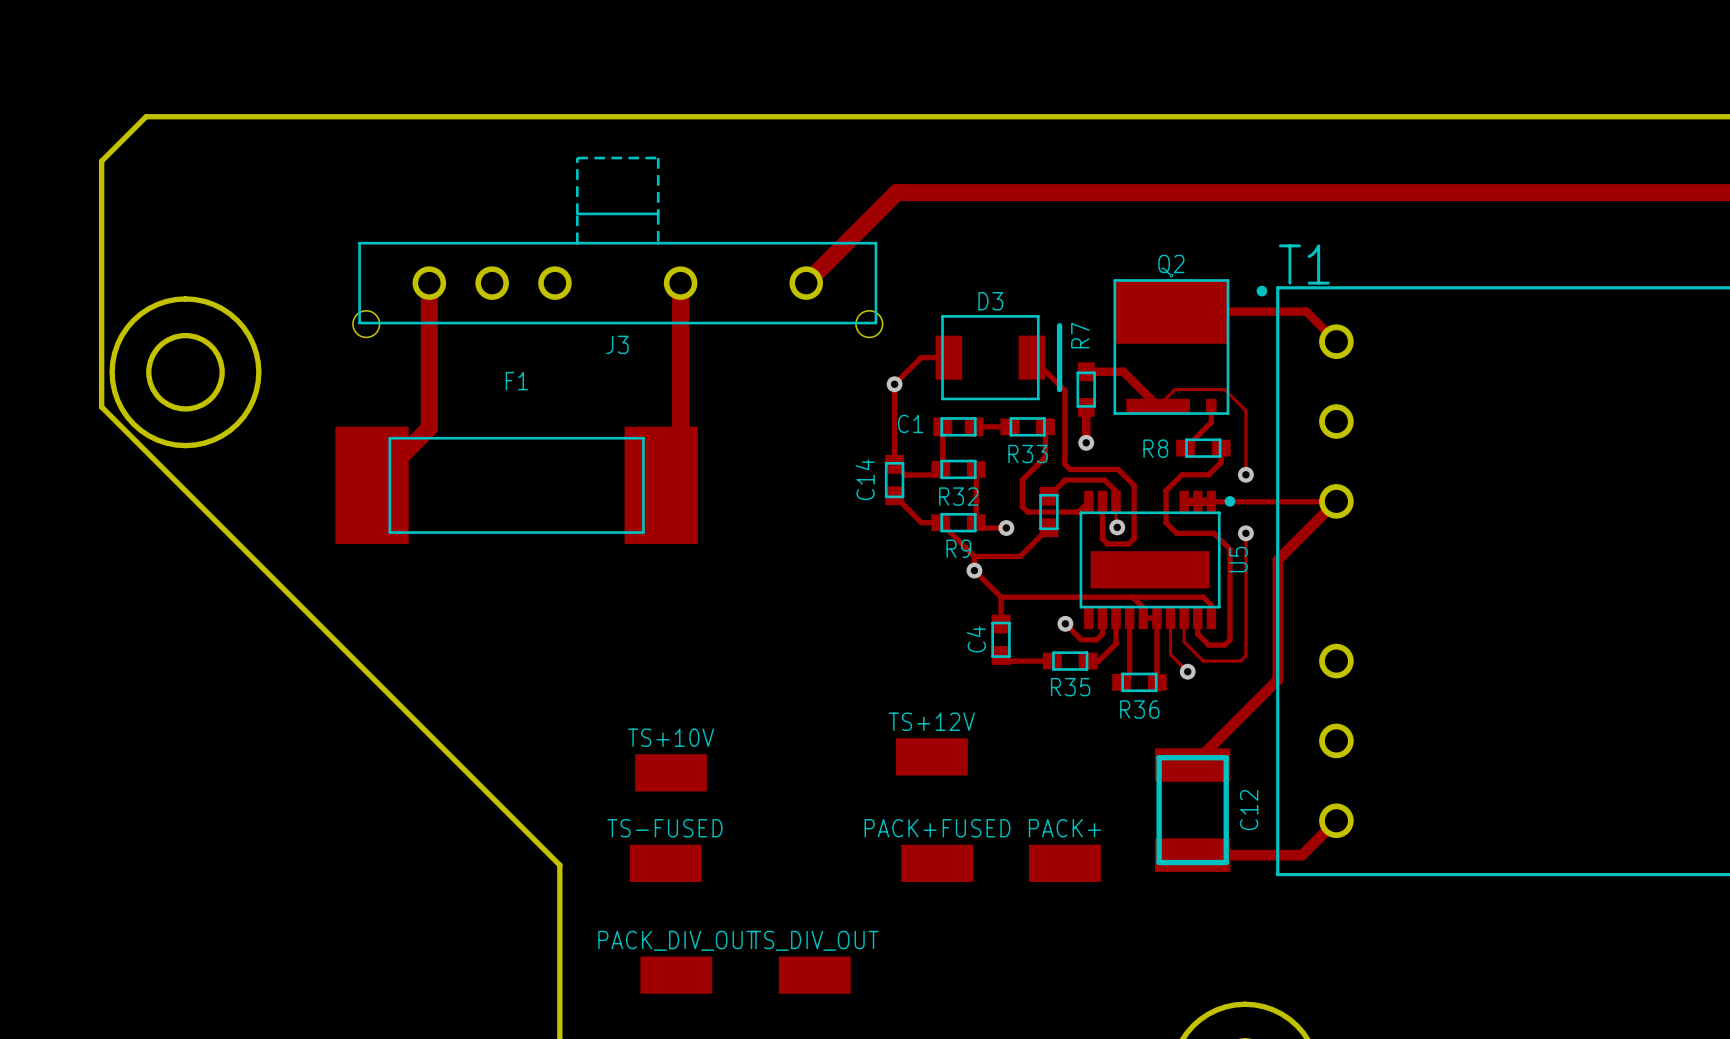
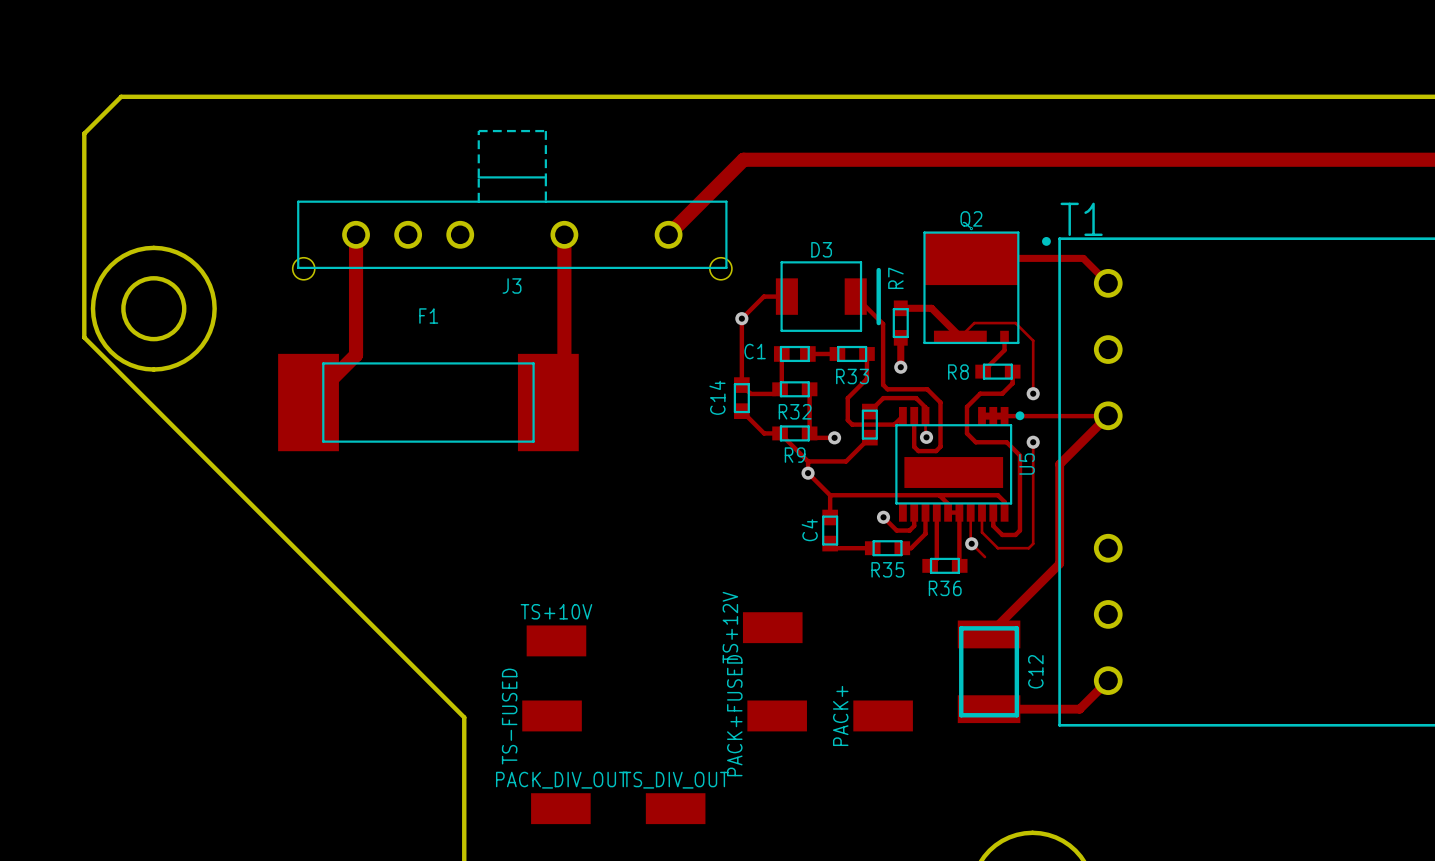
via position: (1187, 671) -> (971, 543)
TS+12V name rotation: 0° (931, 721) -> 90° counterclockwise (730, 627)
TS-FUSED name rotation: 0° (664, 828) -> 90° counterclockwise (509, 716)
PACK+FUSED name rotation: 0° (937, 828) -> 90° counterclockwise (734, 715)
PACK+ name rotation: 0° (1064, 828) -> 90° counterclockwise (840, 715)

